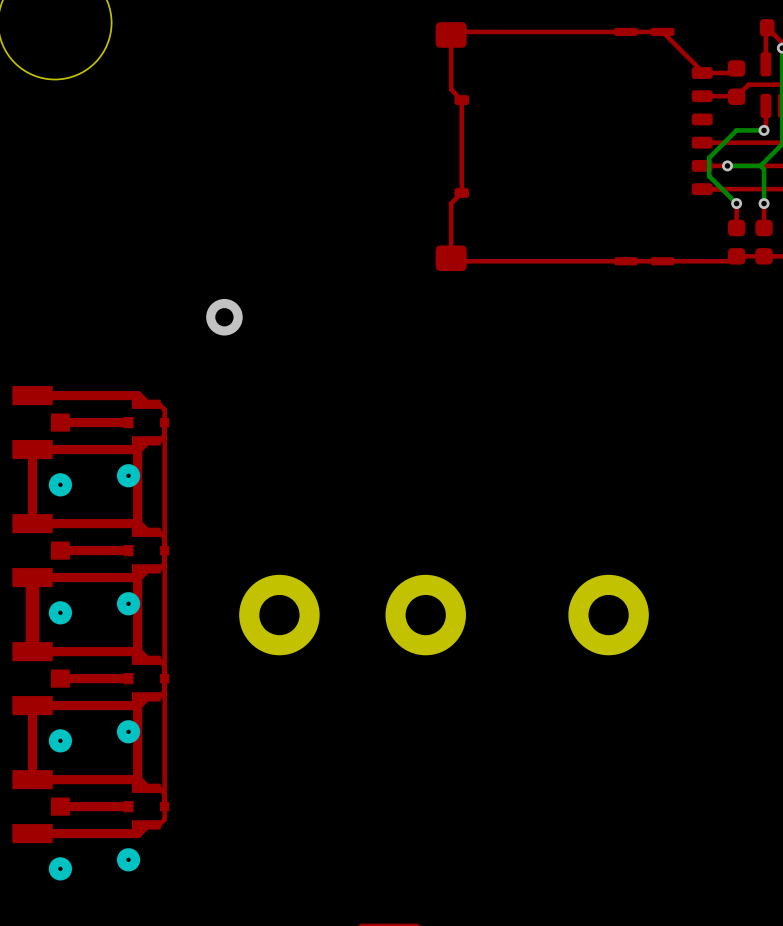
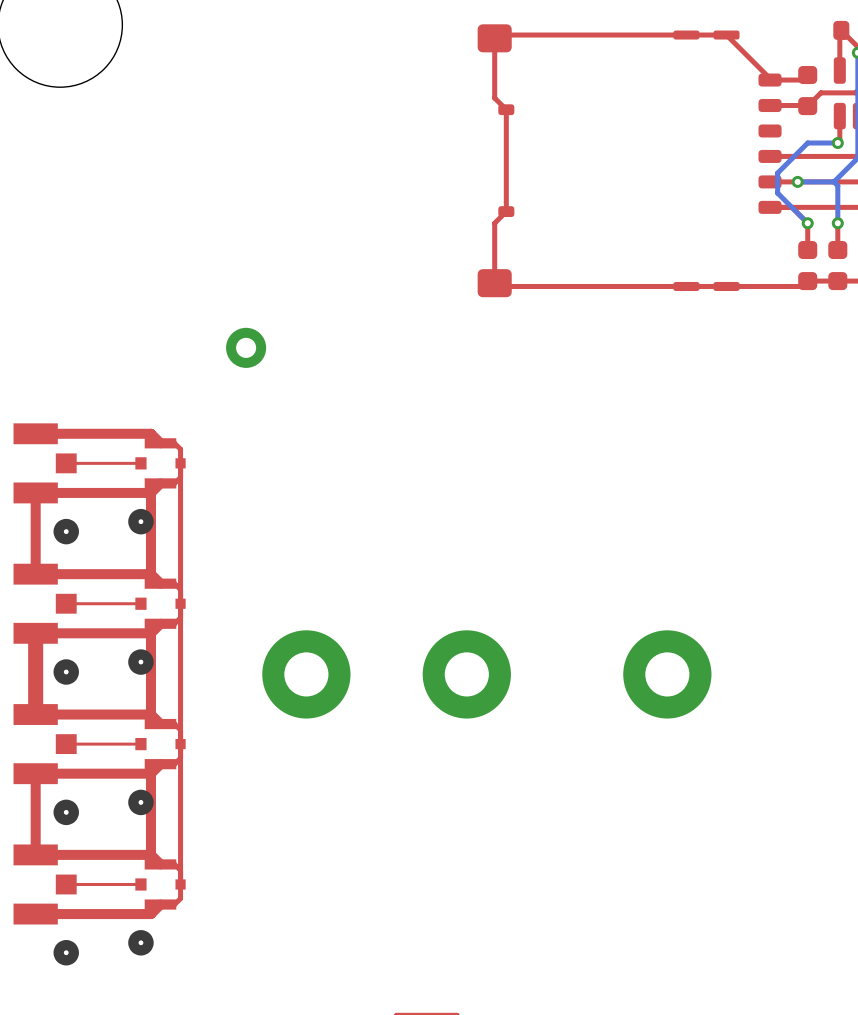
top track width: thick (126, 422) (60, 422) -> thin (138, 463) (66, 463)
top track width: thick (126, 550) (60, 550) -> thin (138, 603) (66, 603)
top track width: thick (126, 678) (60, 678) -> thin (138, 744) (66, 744)
top track width: thick (126, 806) (60, 806) -> thin (138, 884) (66, 884)

